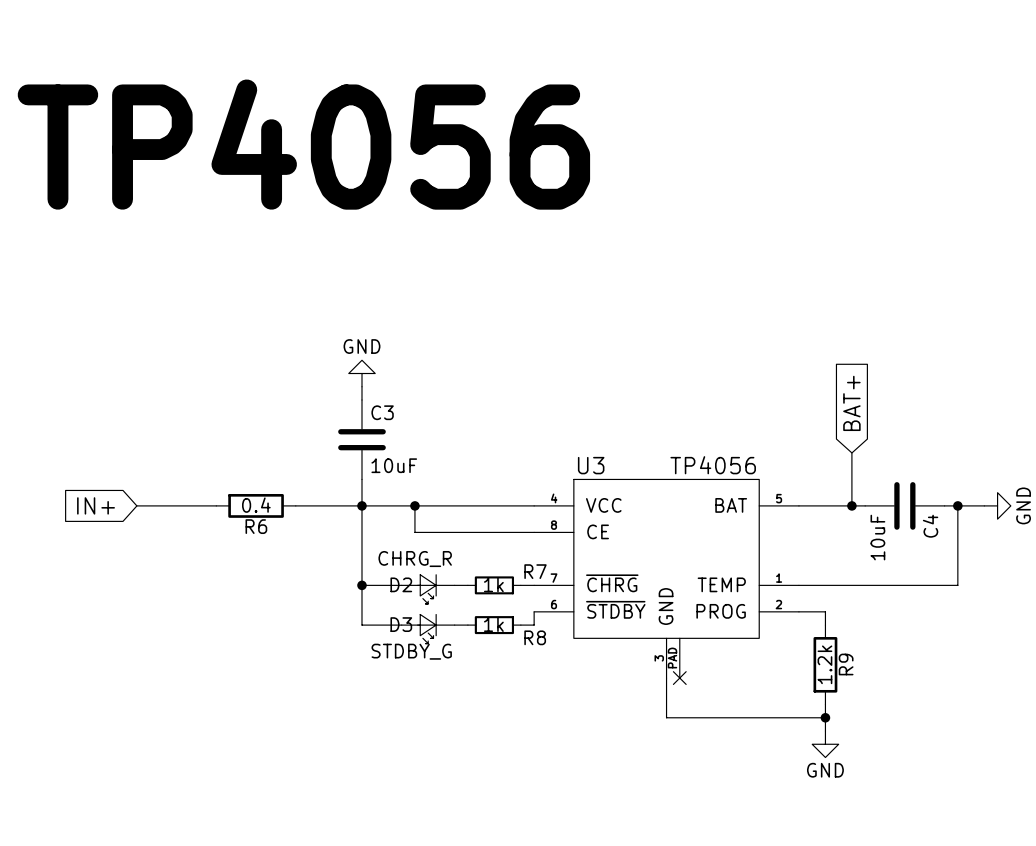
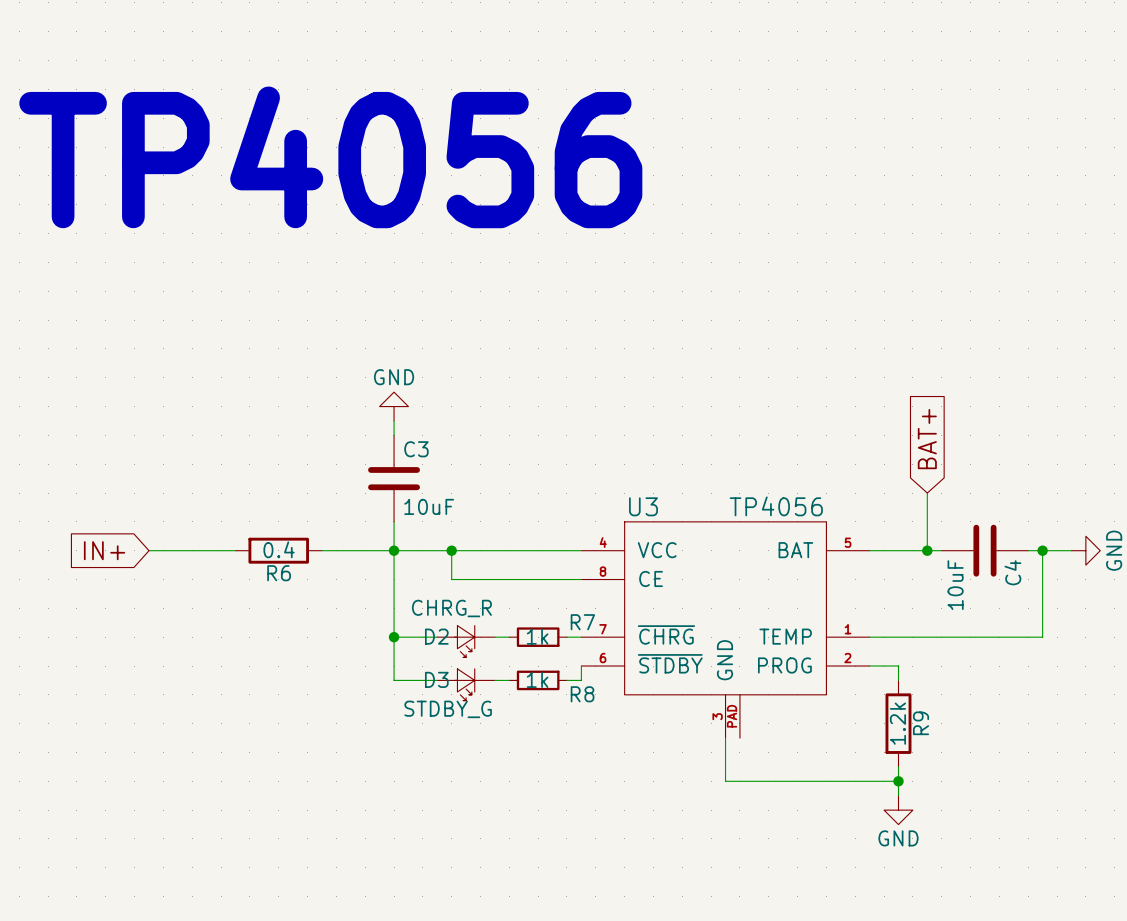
no-connect mark: (679, 678) -> none

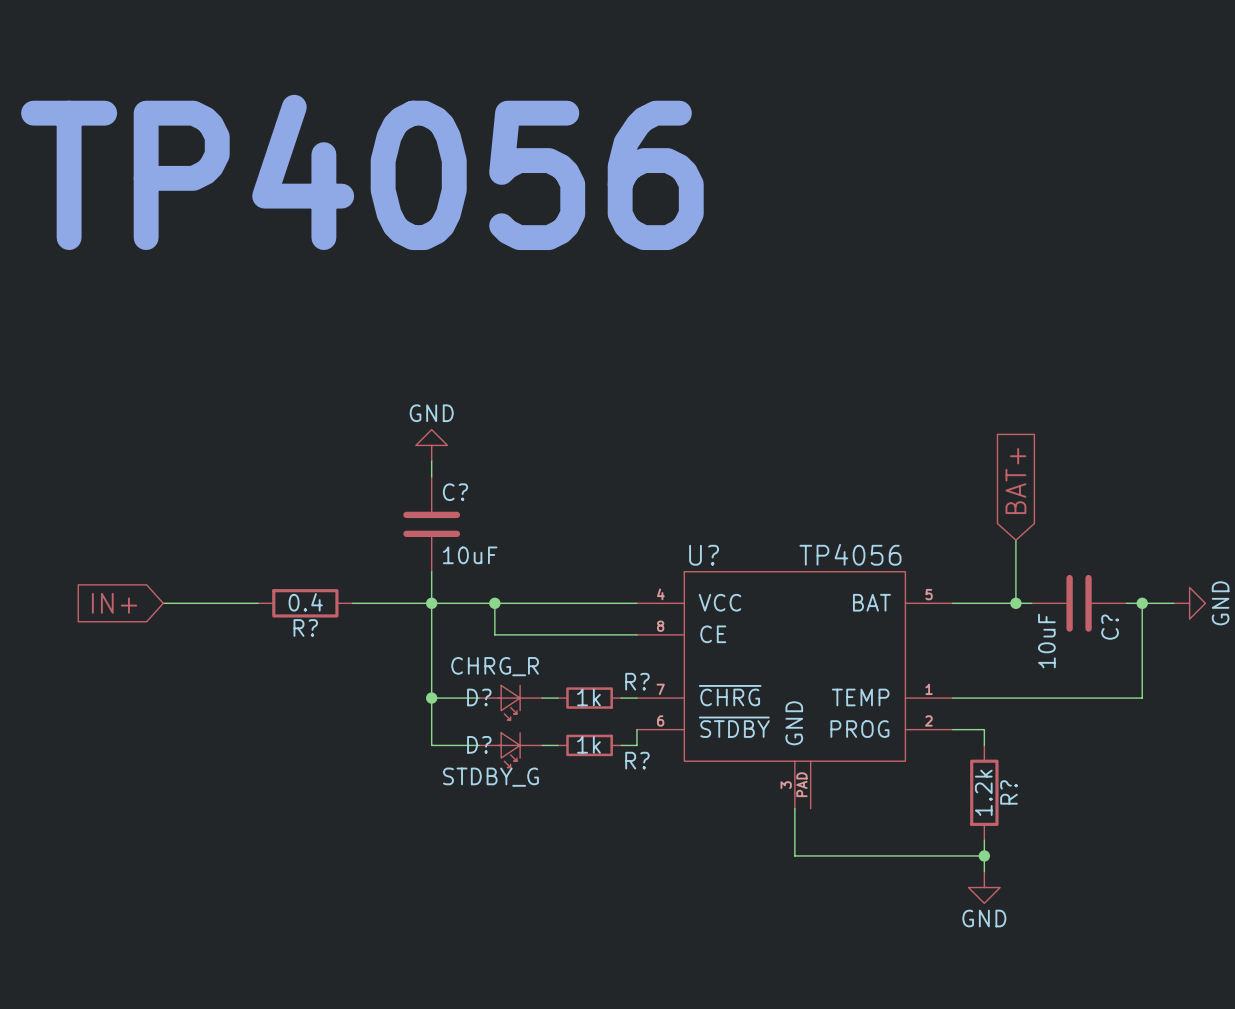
C3 name: C3 (416, 449) -> C? (455, 492)
U3 name: U3 (643, 506) -> U? (704, 555)
C4 name: C4 (1012, 572) -> C? (1110, 627)
R6 name: R6 (279, 573) -> R? (305, 627)
R7 name: R7 (582, 622) -> R? (637, 681)
D2 name: D2 (436, 636) -> D? (479, 697)
D3 name: D3 (436, 679) -> D? (479, 744)
R8 name: R8 (582, 694) -> R? (637, 760)
R9 name: R9 (921, 723) -> R? (1009, 792)

